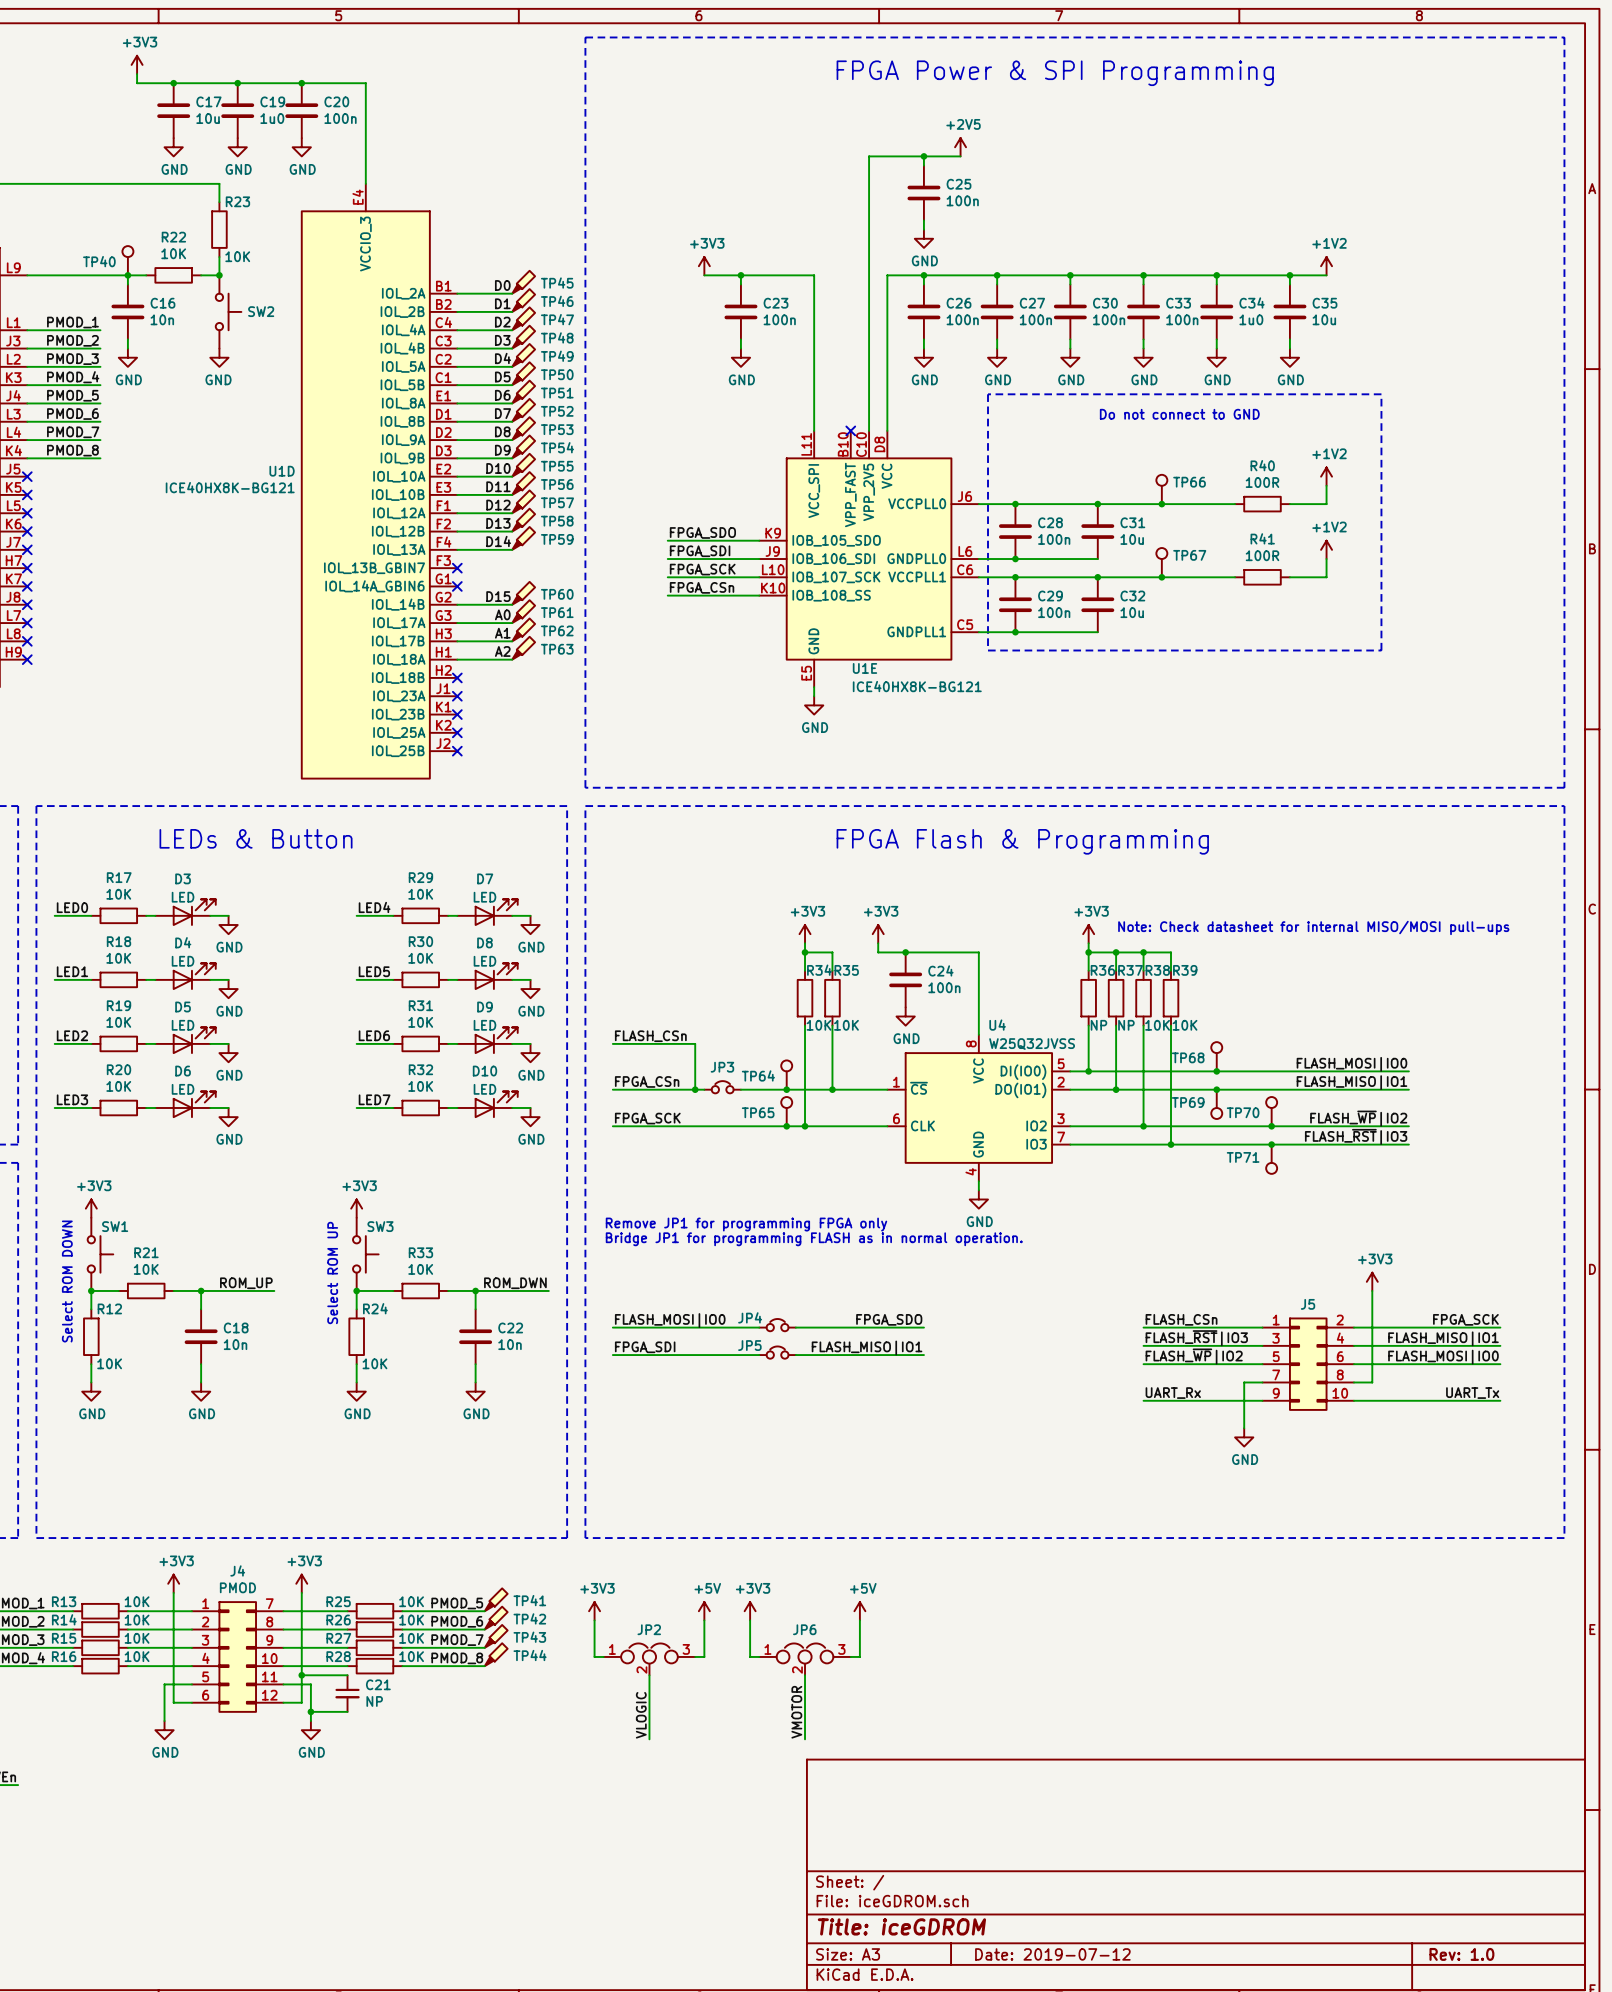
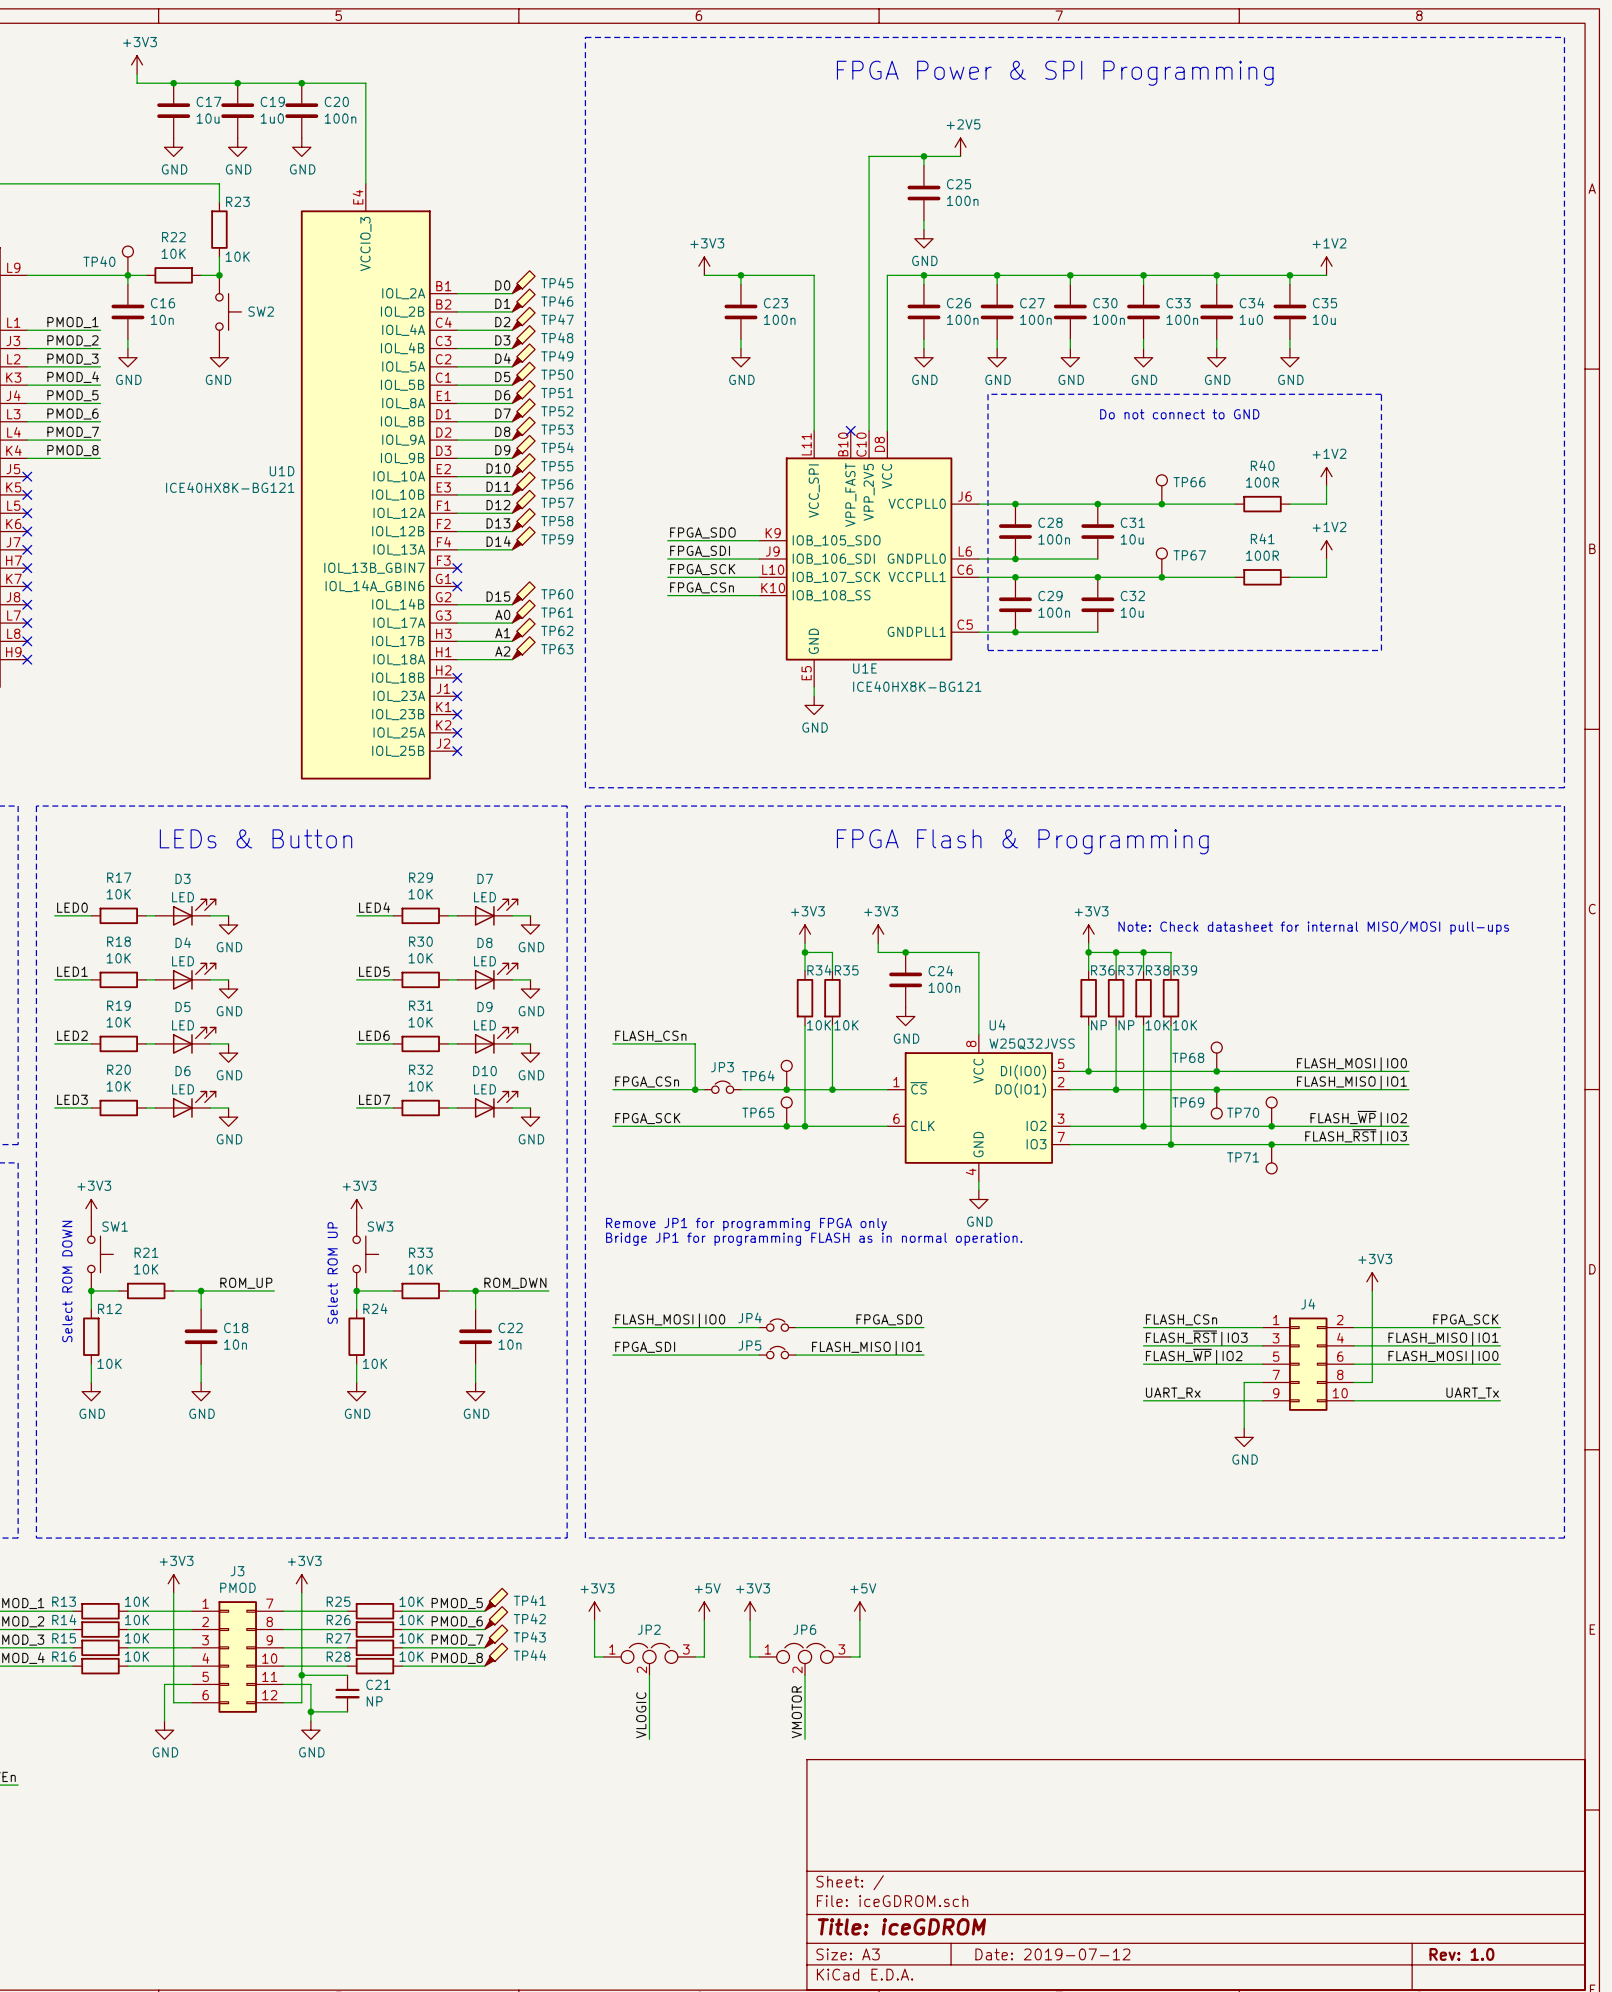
J5 name: J5 (1308, 1304) -> J4 (1308, 1304)
J4 name: J4 (237, 1570) -> J3 (237, 1571)

